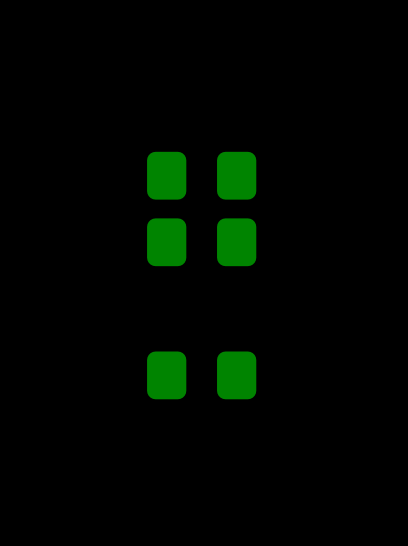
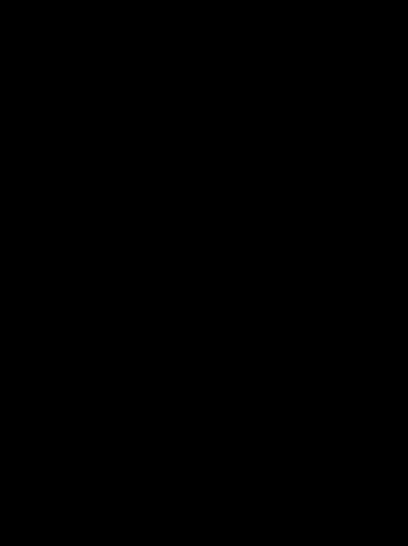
part: (201, 175) -> none
part: (201, 242) -> none
part: (201, 375) -> none

